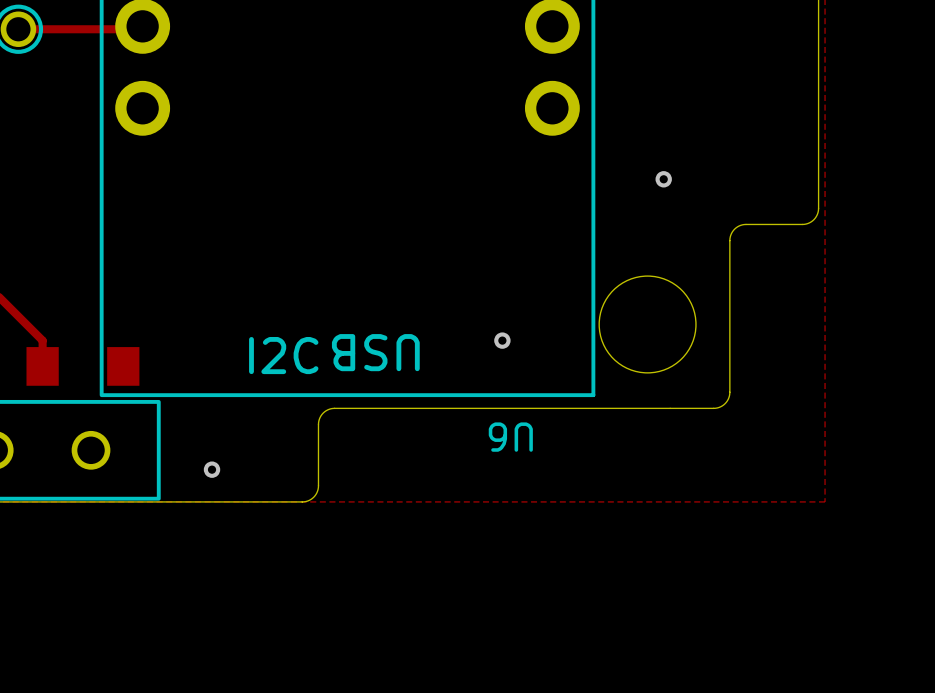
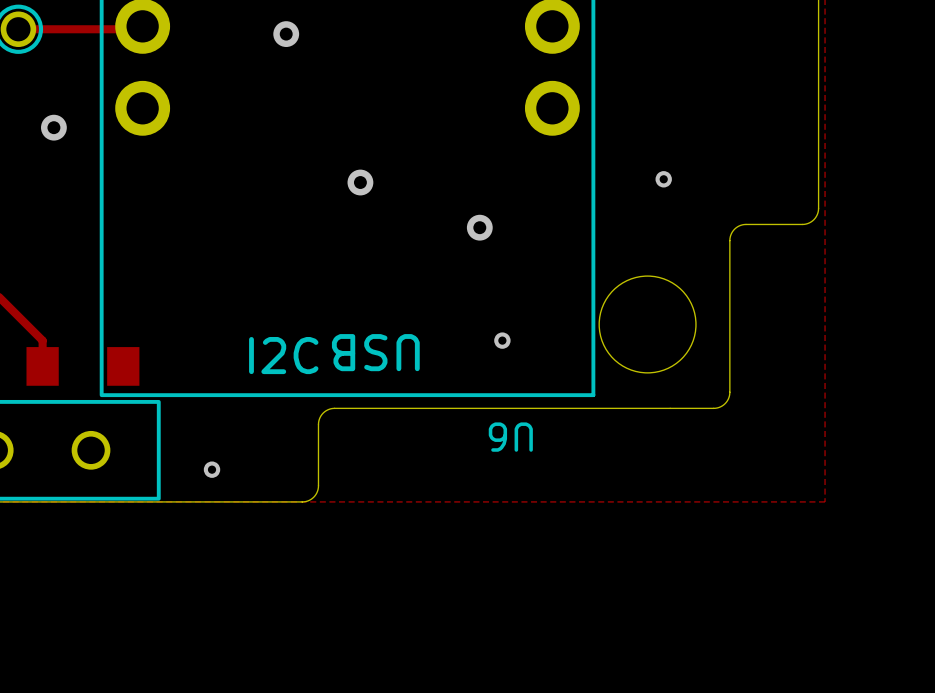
via: none -> (286, 34)
via: none -> (53, 127)
via: none -> (360, 182)
via: none -> (479, 227)

